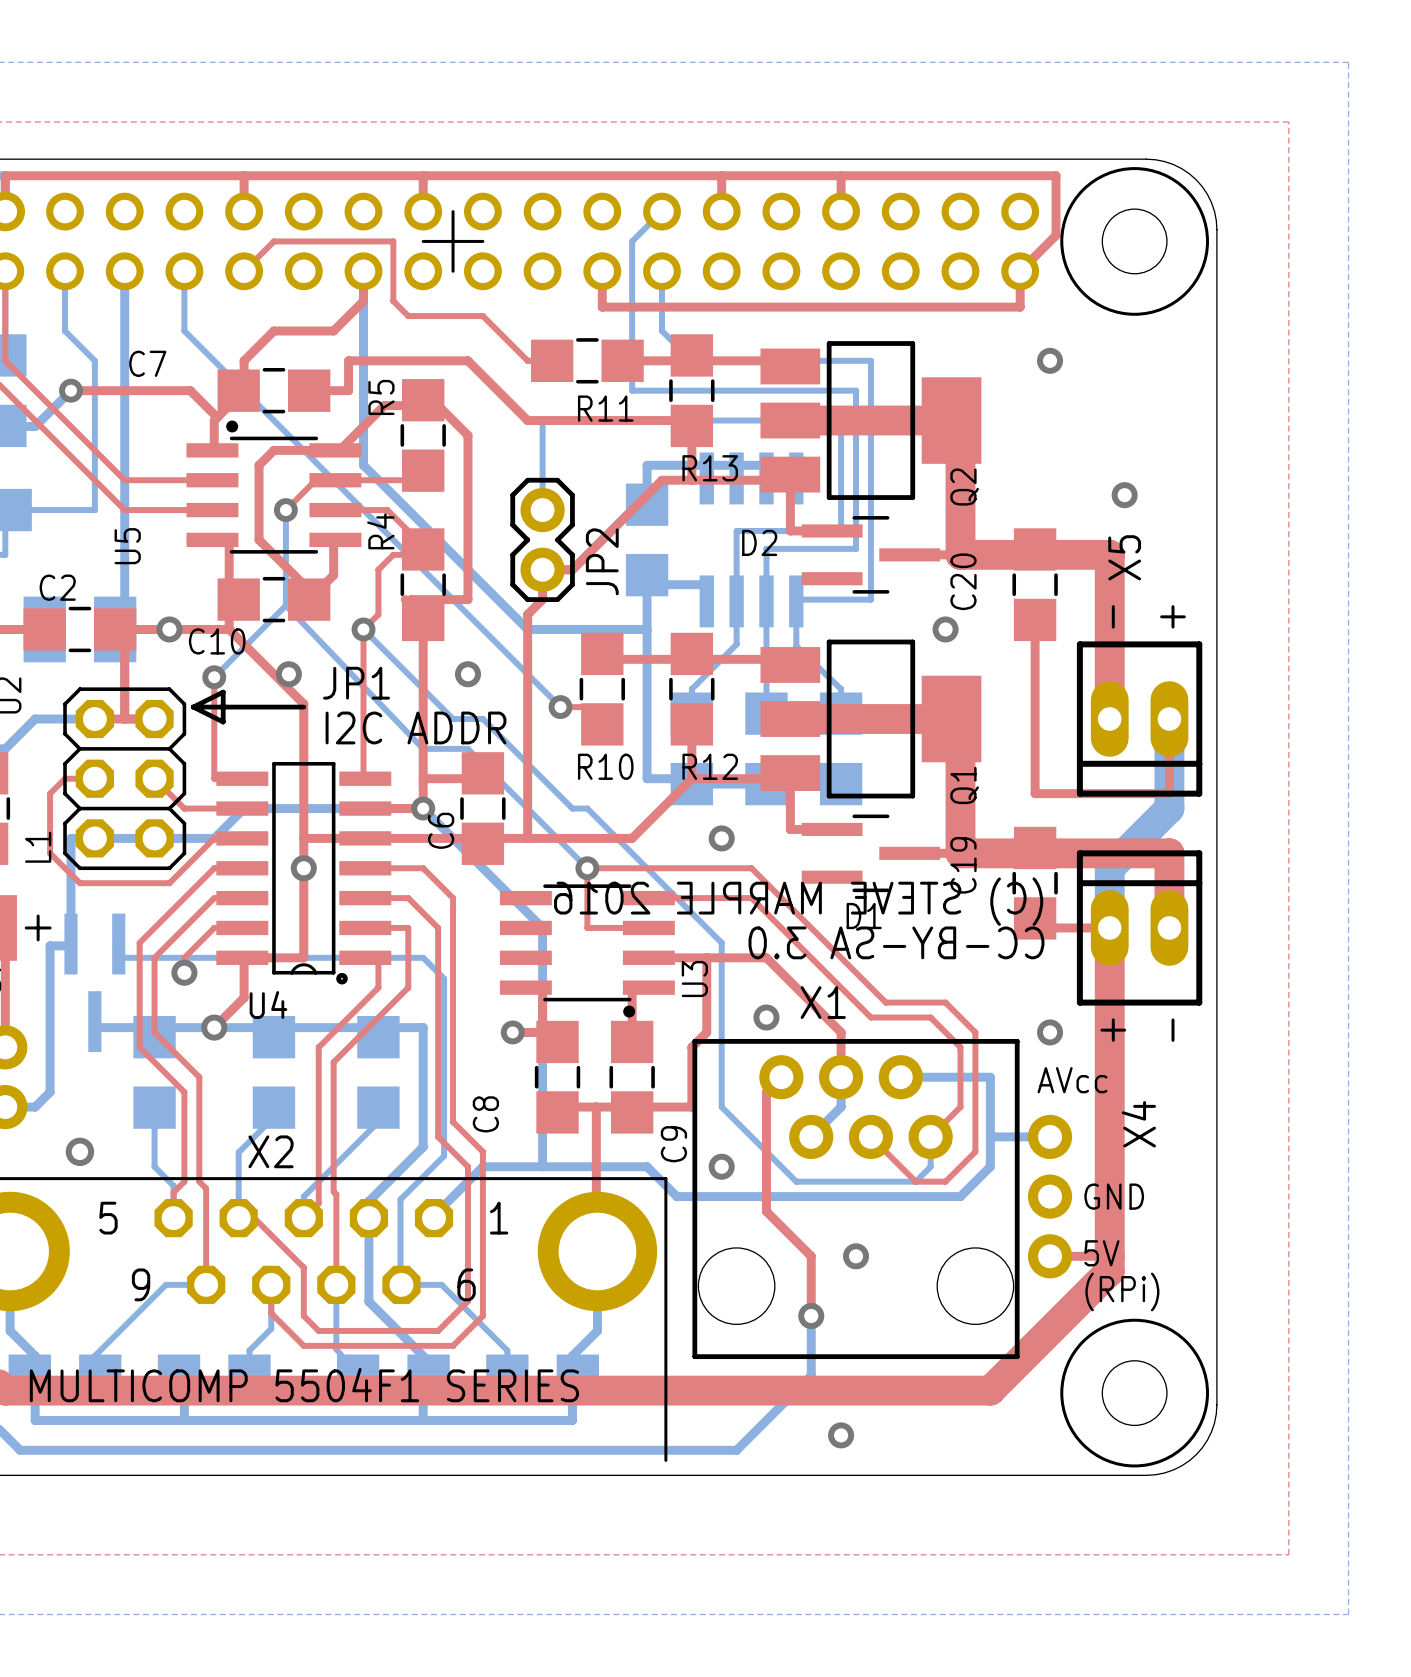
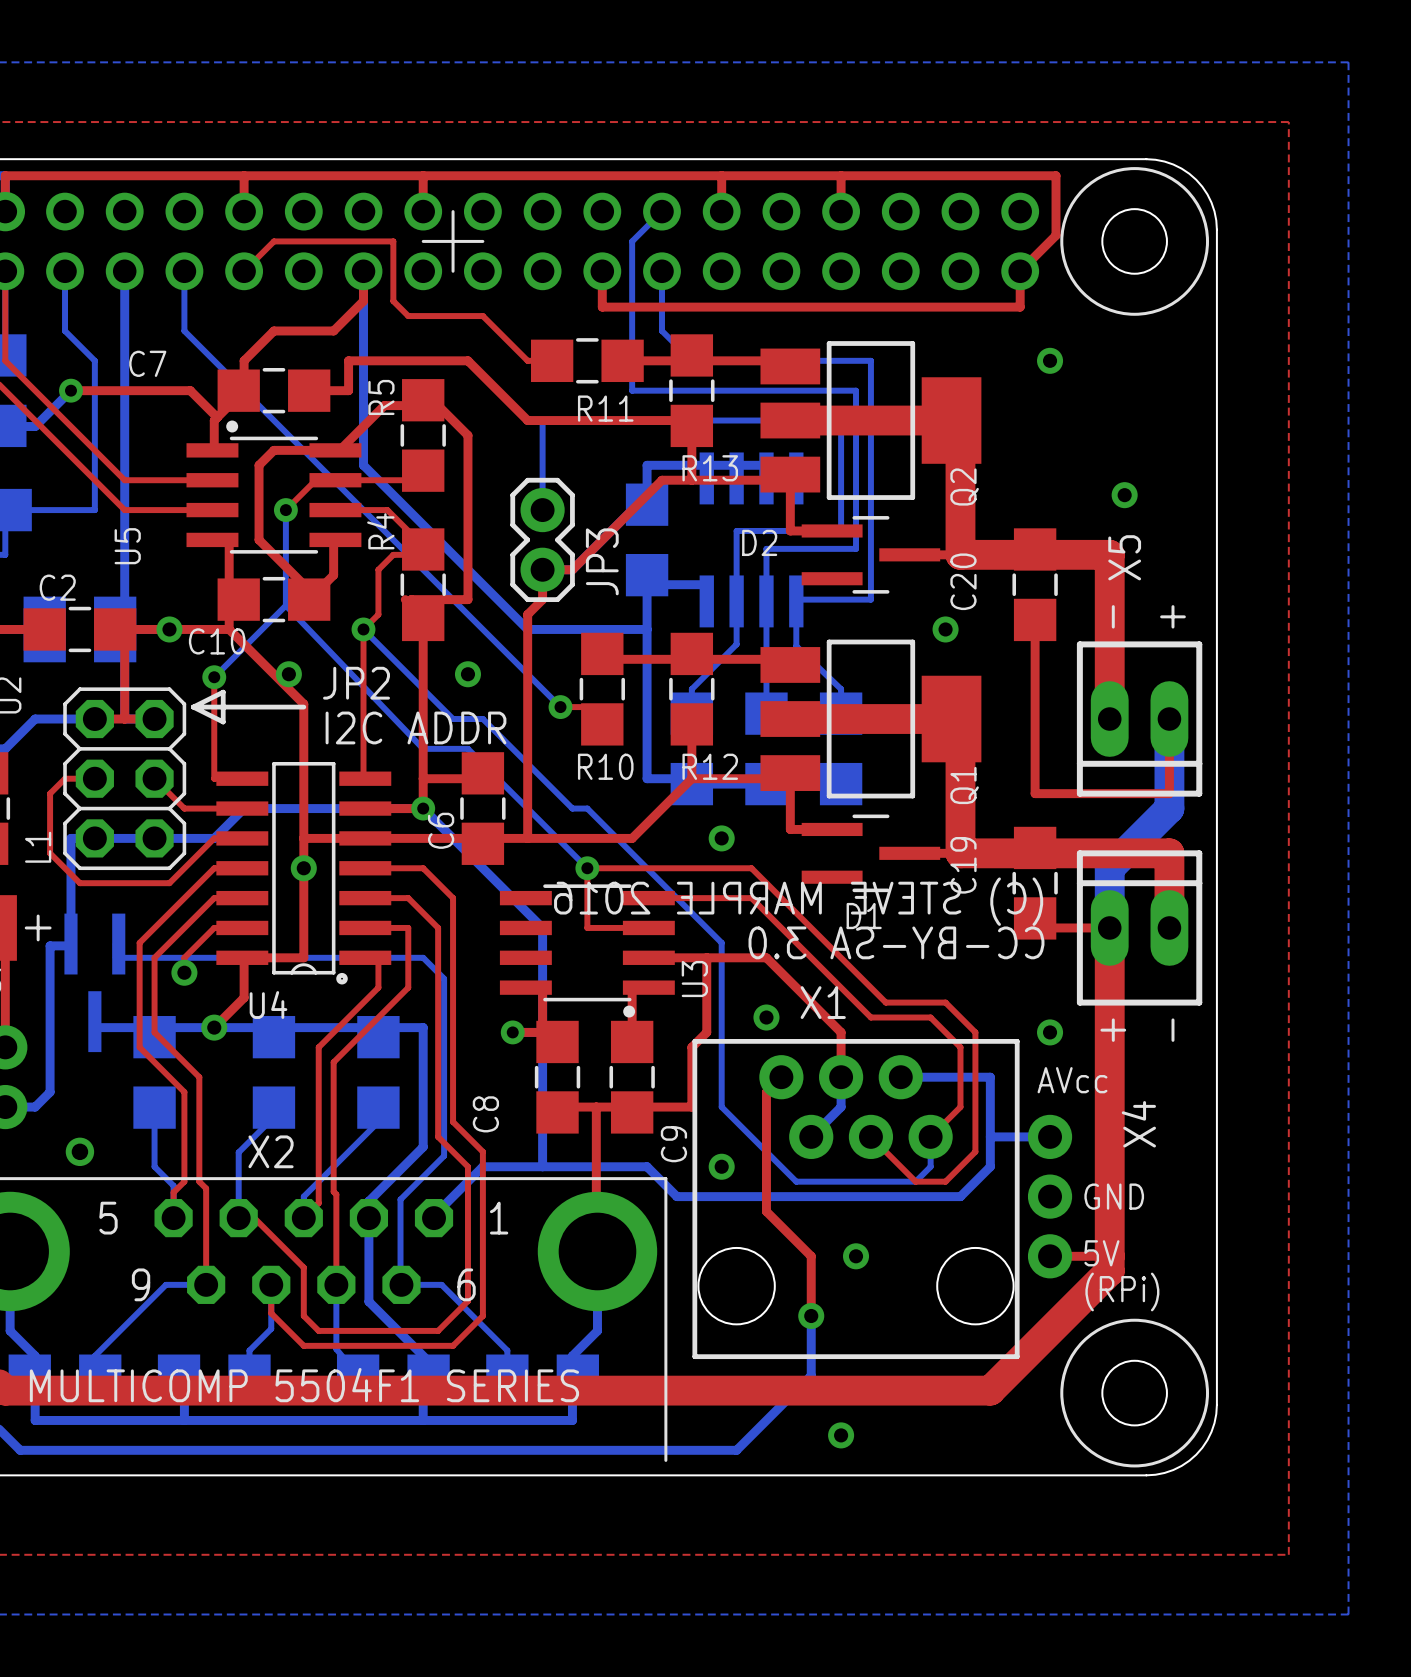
JP2 name: JP2 (602, 561) -> JP3 (602, 561)
JP1 name: JP1 (356, 683) -> JP2 (356, 683)

